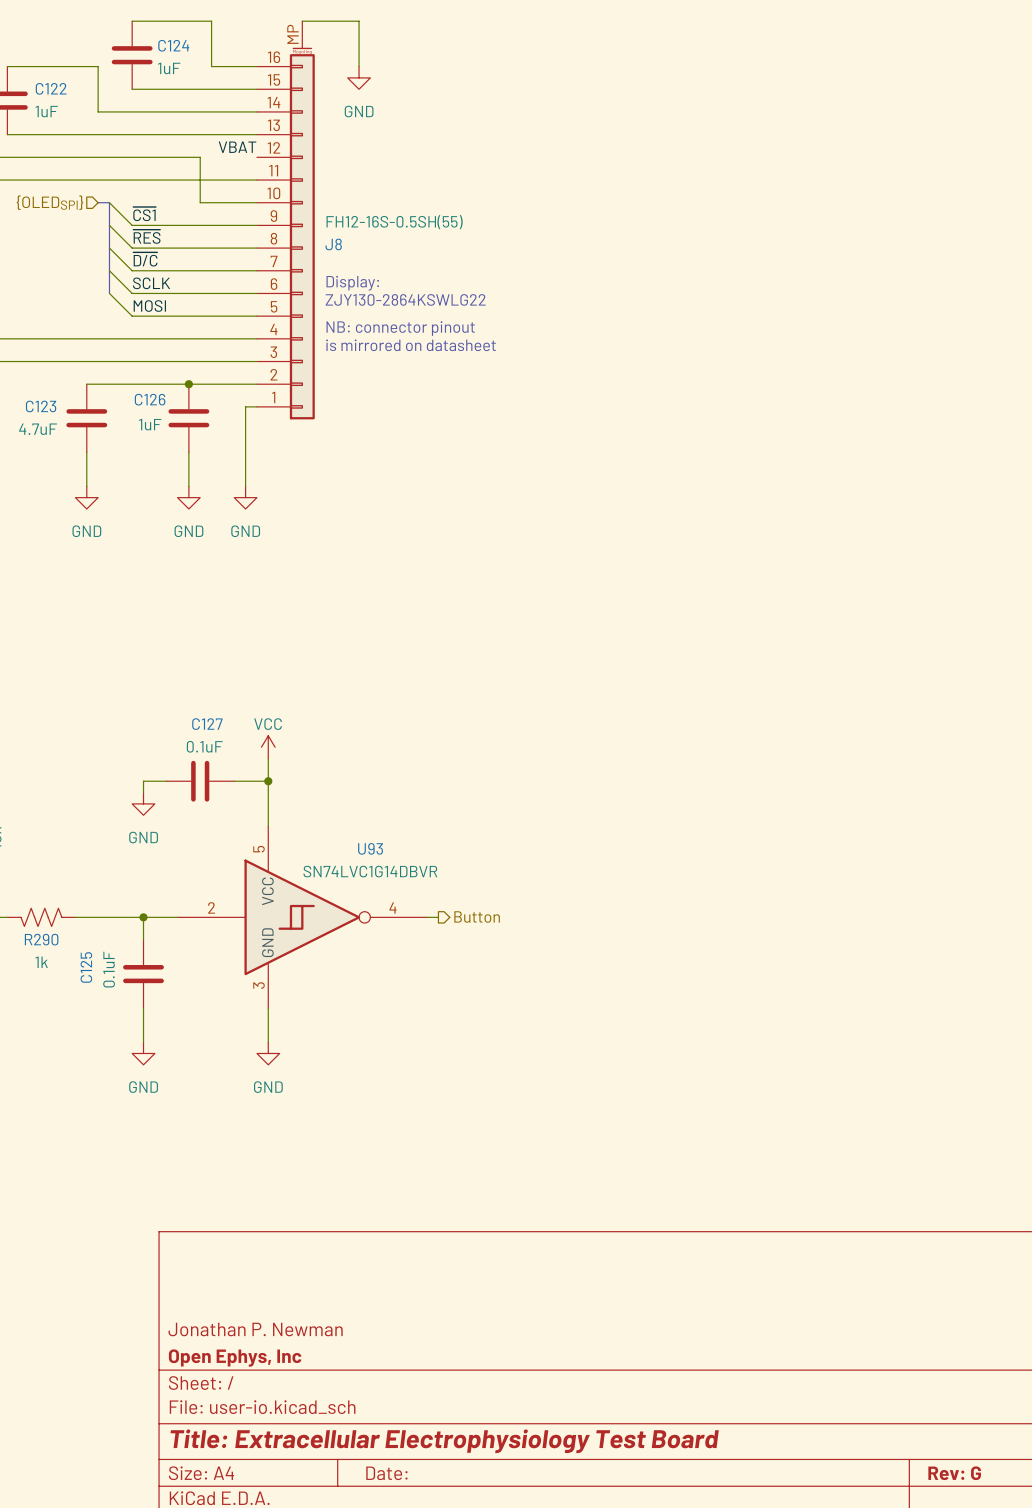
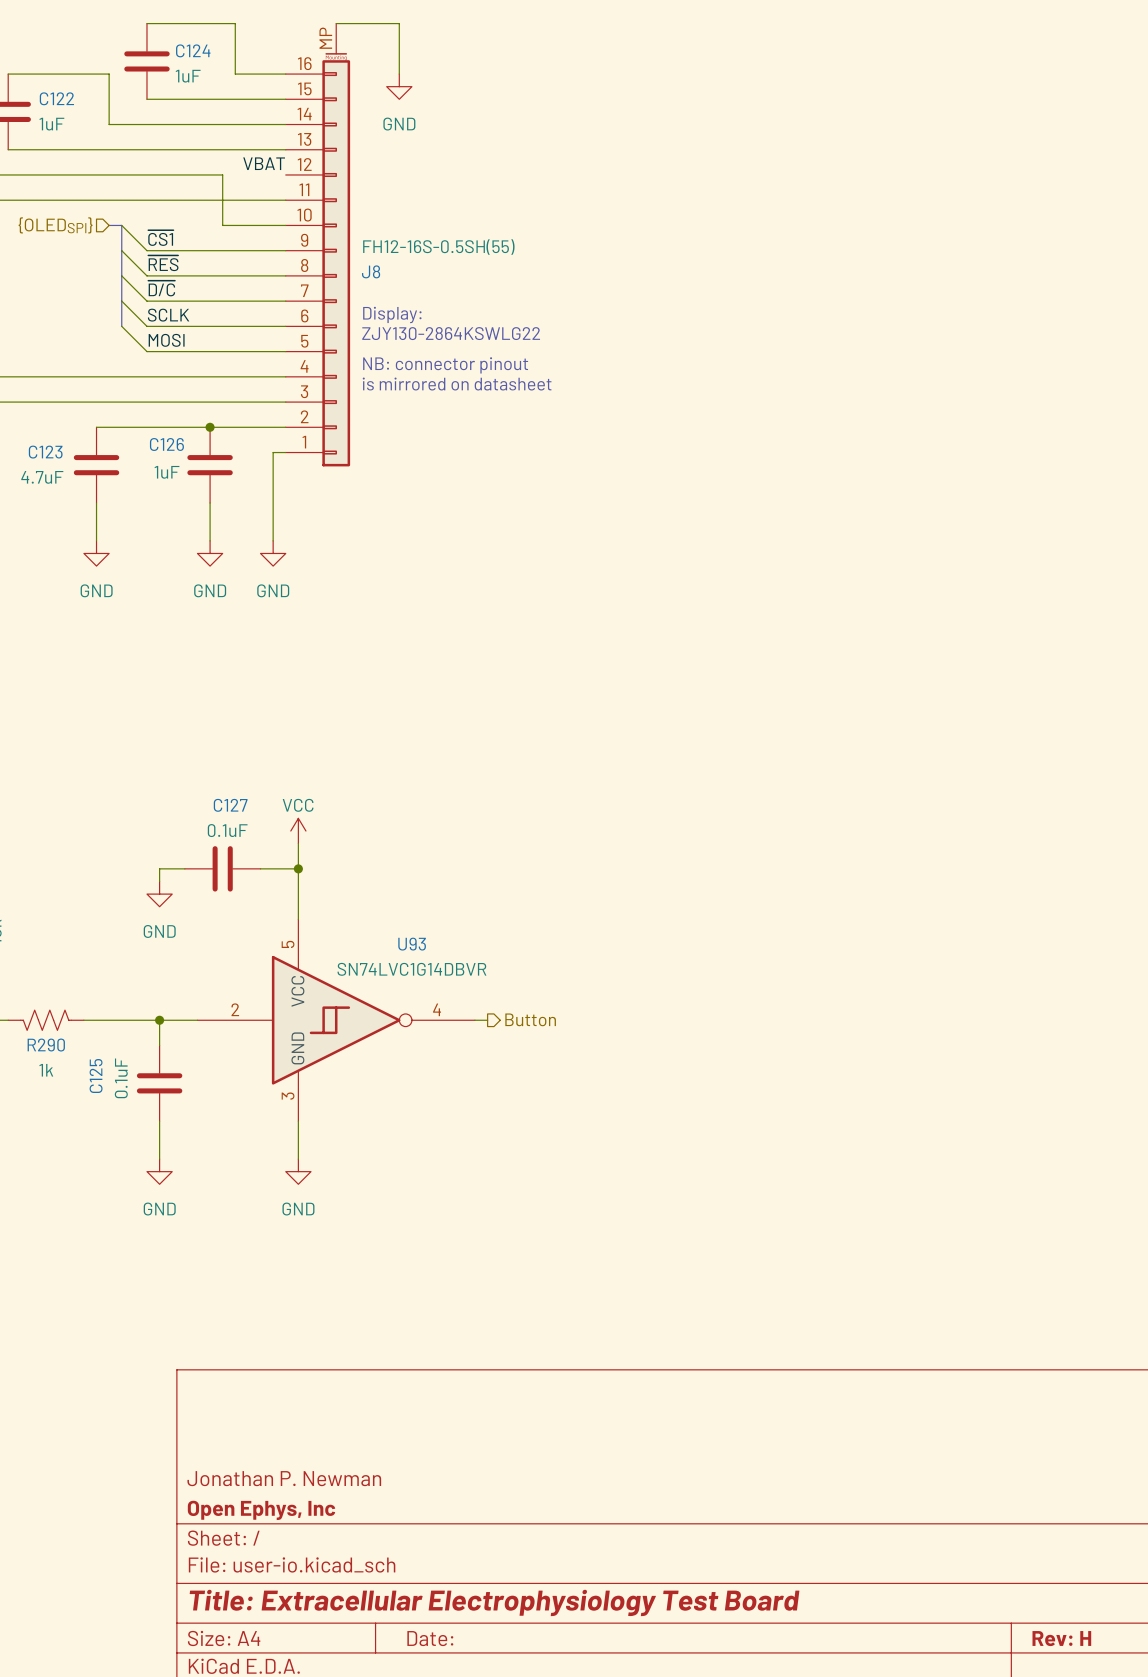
title block: Rev: G (954, 1473) -> Rev: H (1061, 1638)

